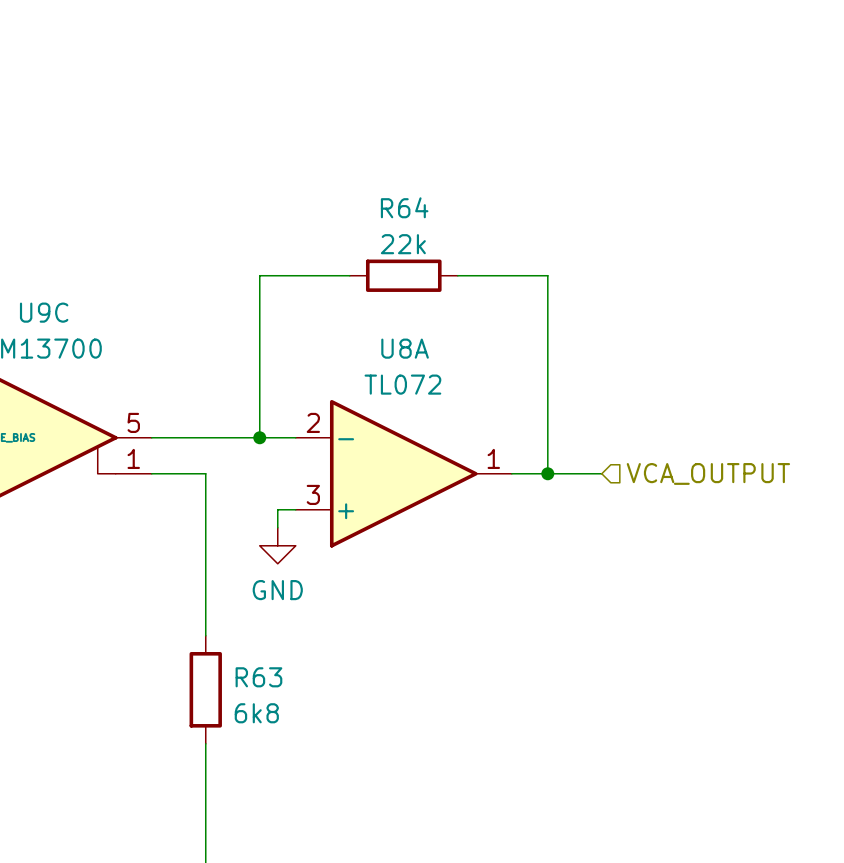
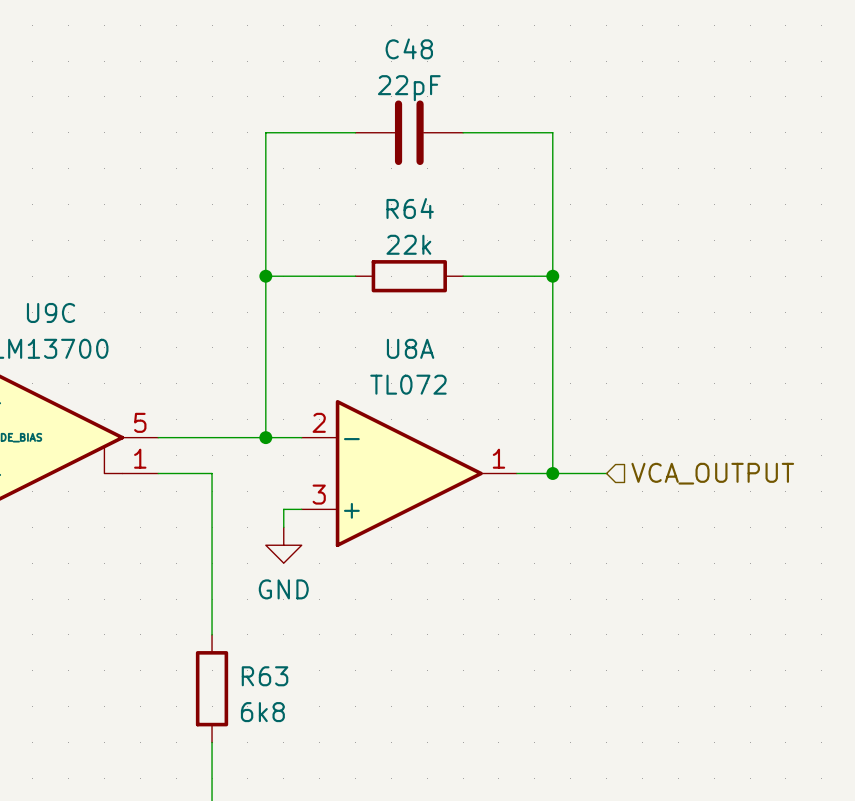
wire: none -> (355, 132) (265, 132) (265, 276)
C48: none -> 22pF (409, 132)
wire: none -> (463, 132) (552, 132) (552, 276)
junction: none -> (265, 276)
junction: none -> (552, 276)

